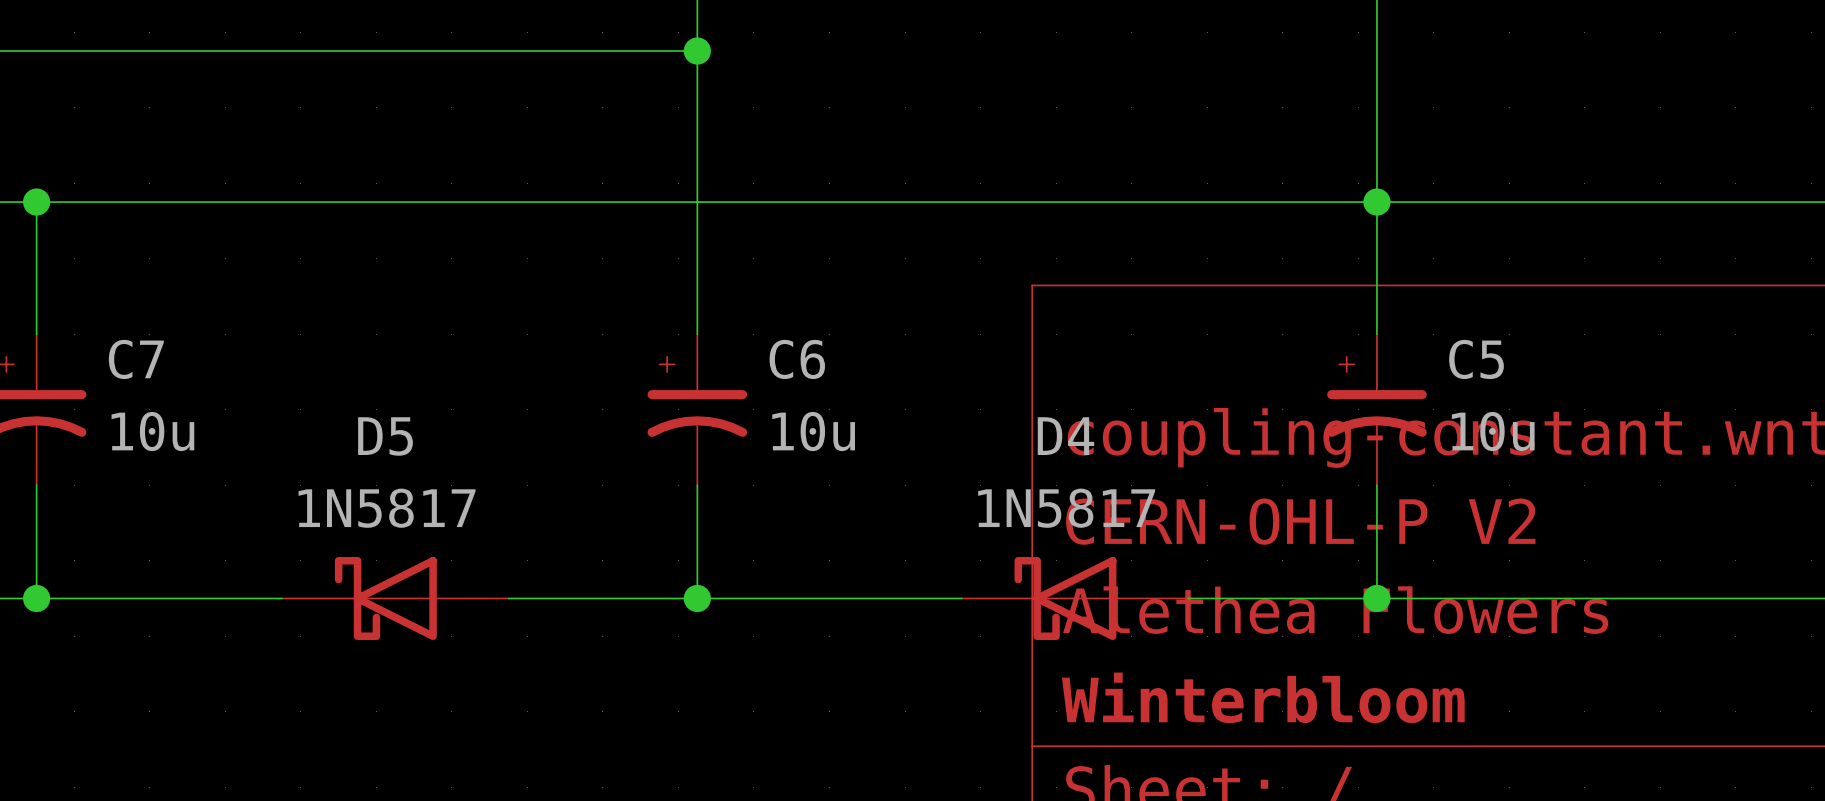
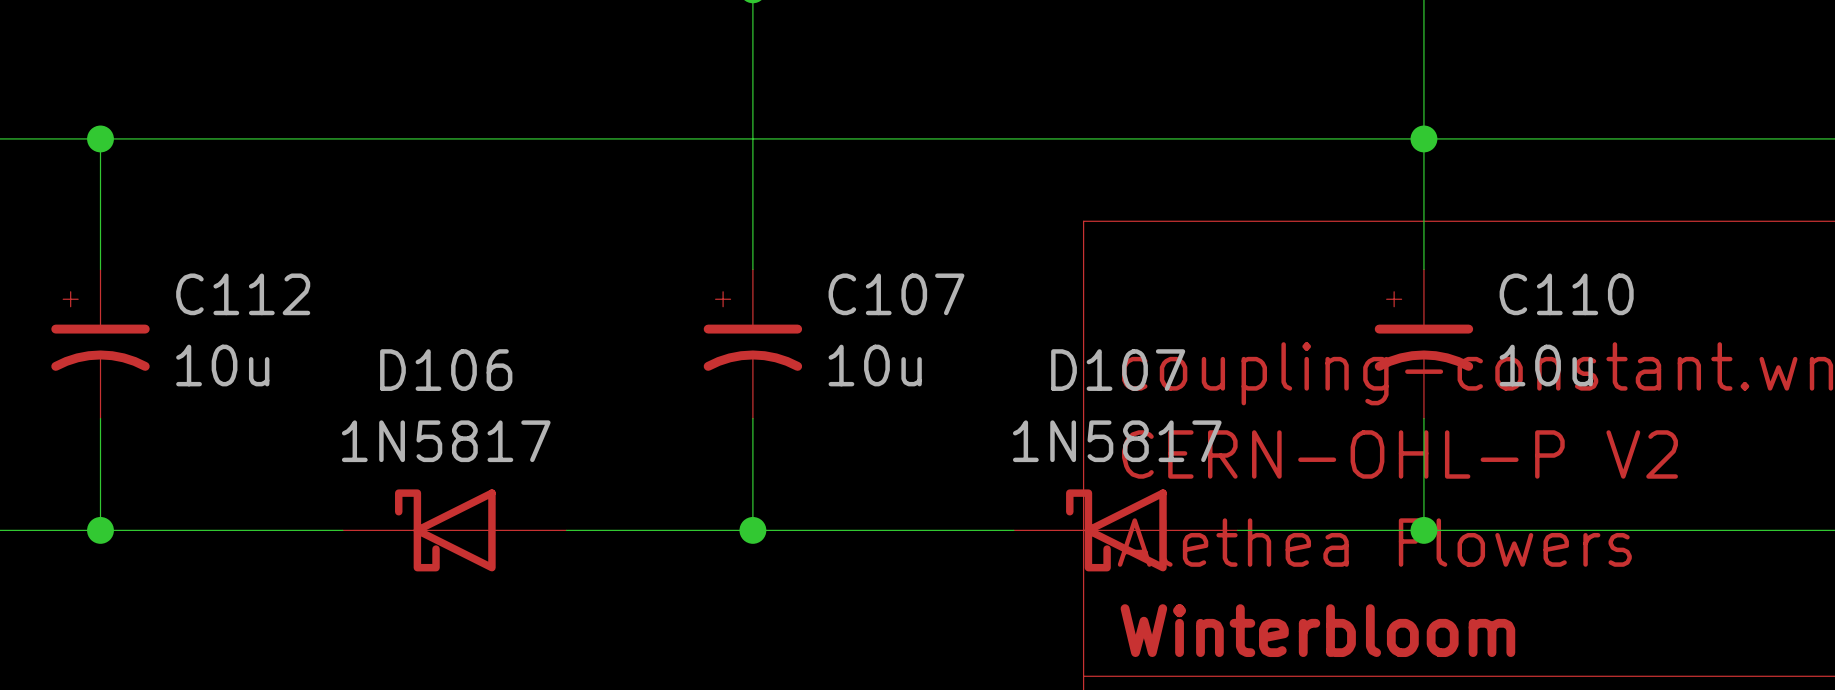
C7 name: C7 (136, 359) -> C112 (243, 294)
C6 name: C6 (797, 359) -> C107 (896, 294)
C5 name: C5 (1476, 359) -> C110 (1566, 294)
D5 name: D5 (385, 436) -> D106 (446, 370)
D4 name: D4 (1065, 436) -> D107 (1118, 370)

